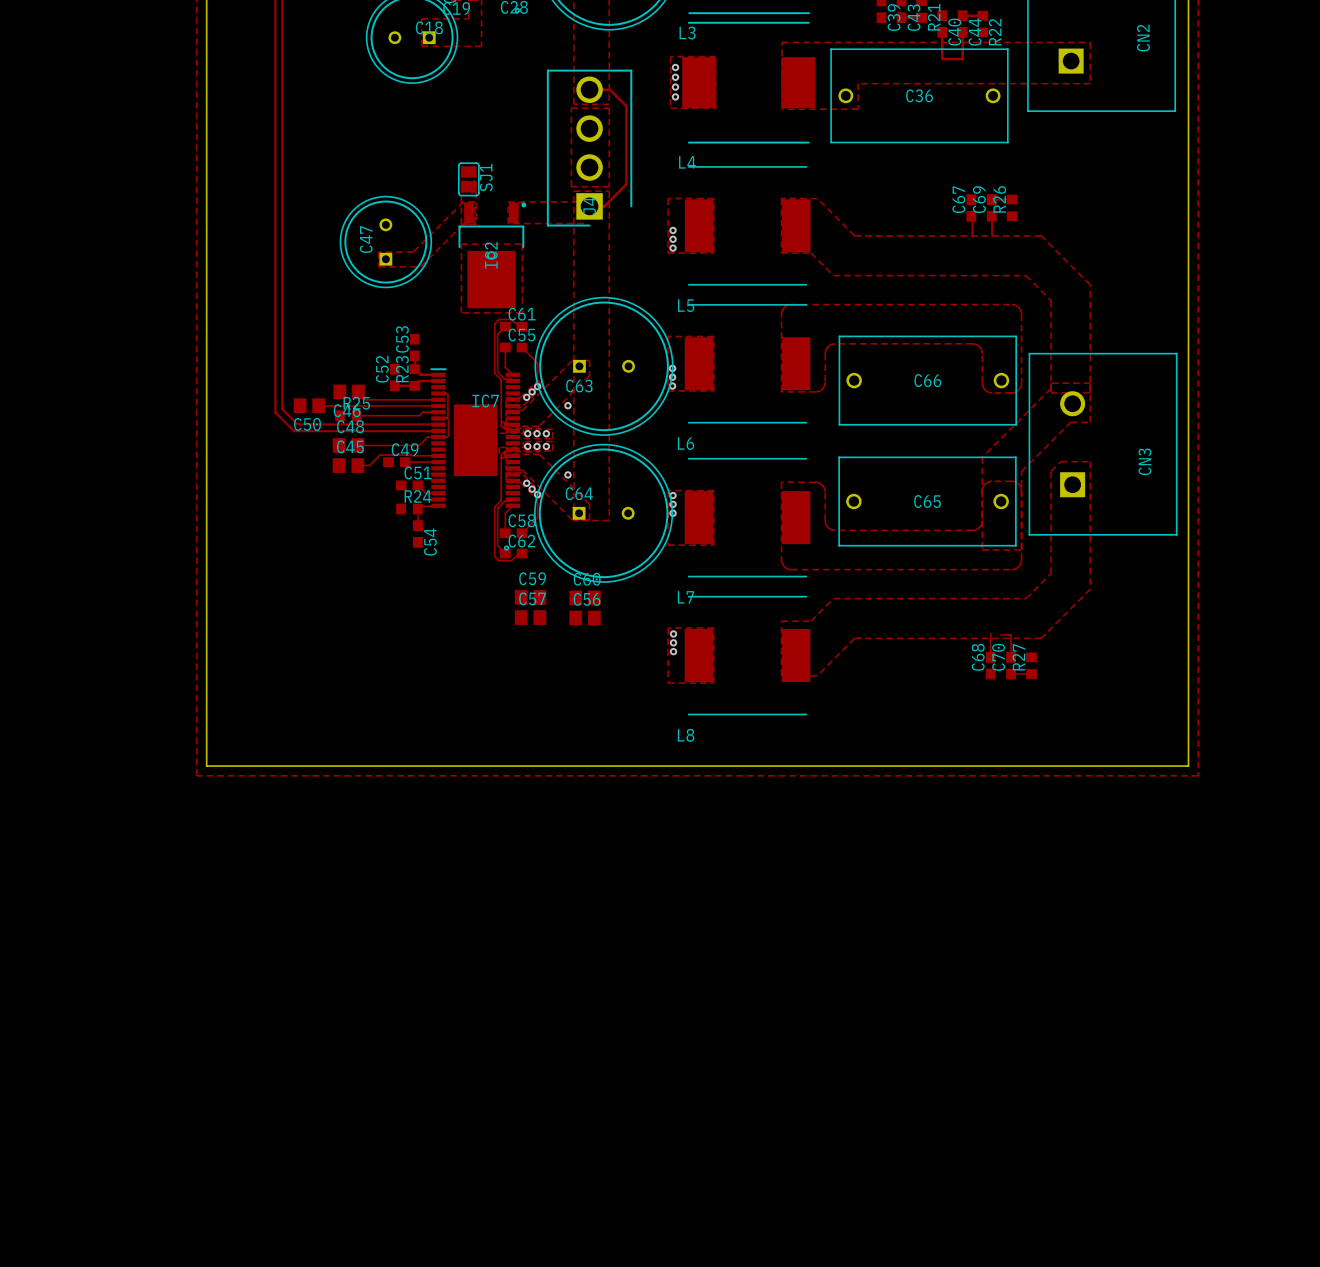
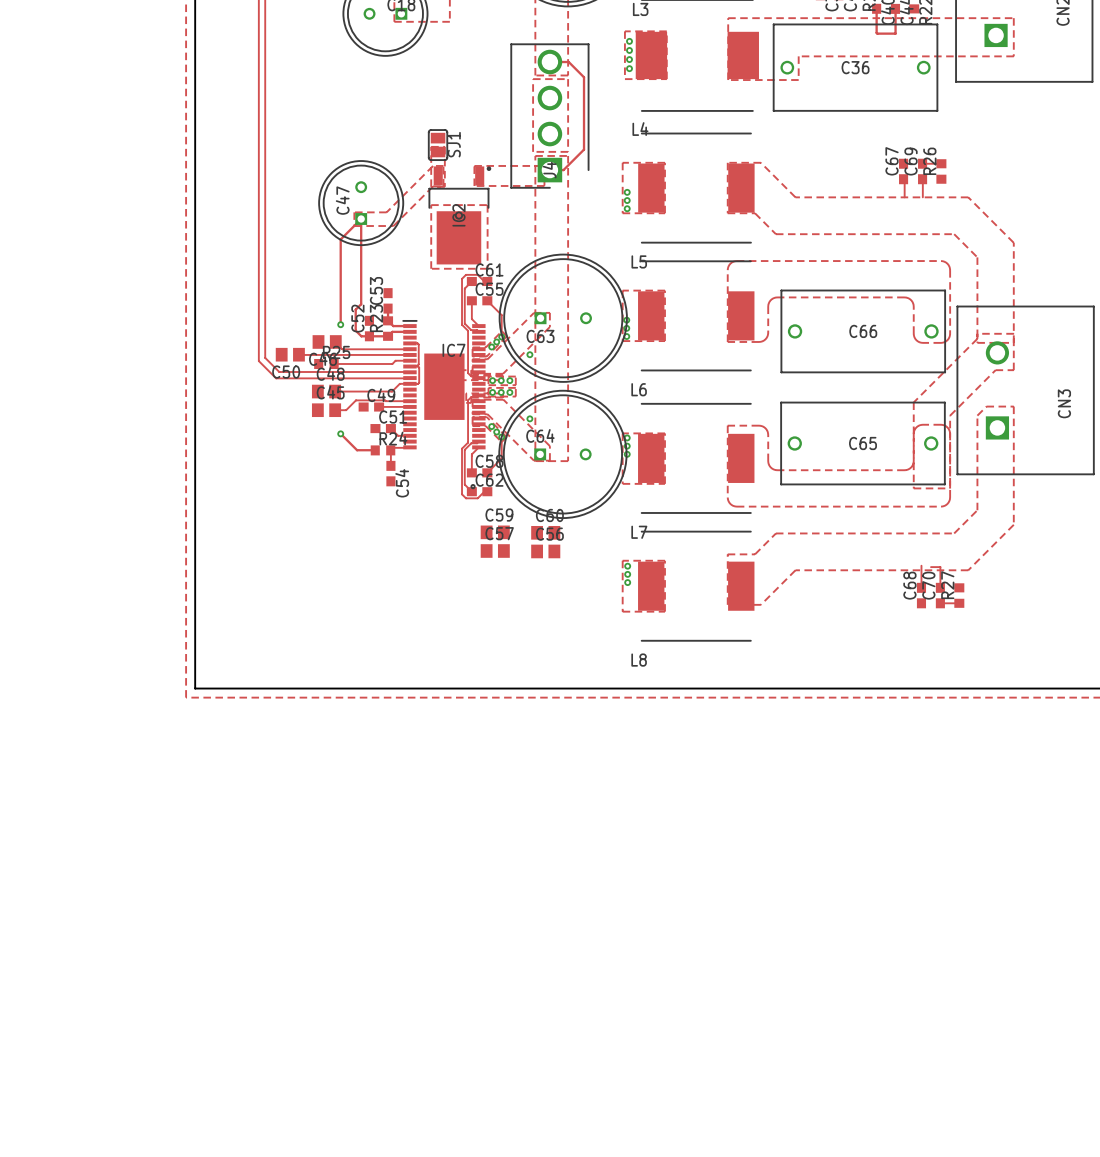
track: none -> (340, 324) (340, 239) (361, 219) (361, 304) (355, 309) (355, 330) (361, 336) (369, 336)
via: none -> (340, 324)
track: none -> (340, 433) (357, 450) (375, 450)
via: none -> (340, 433)

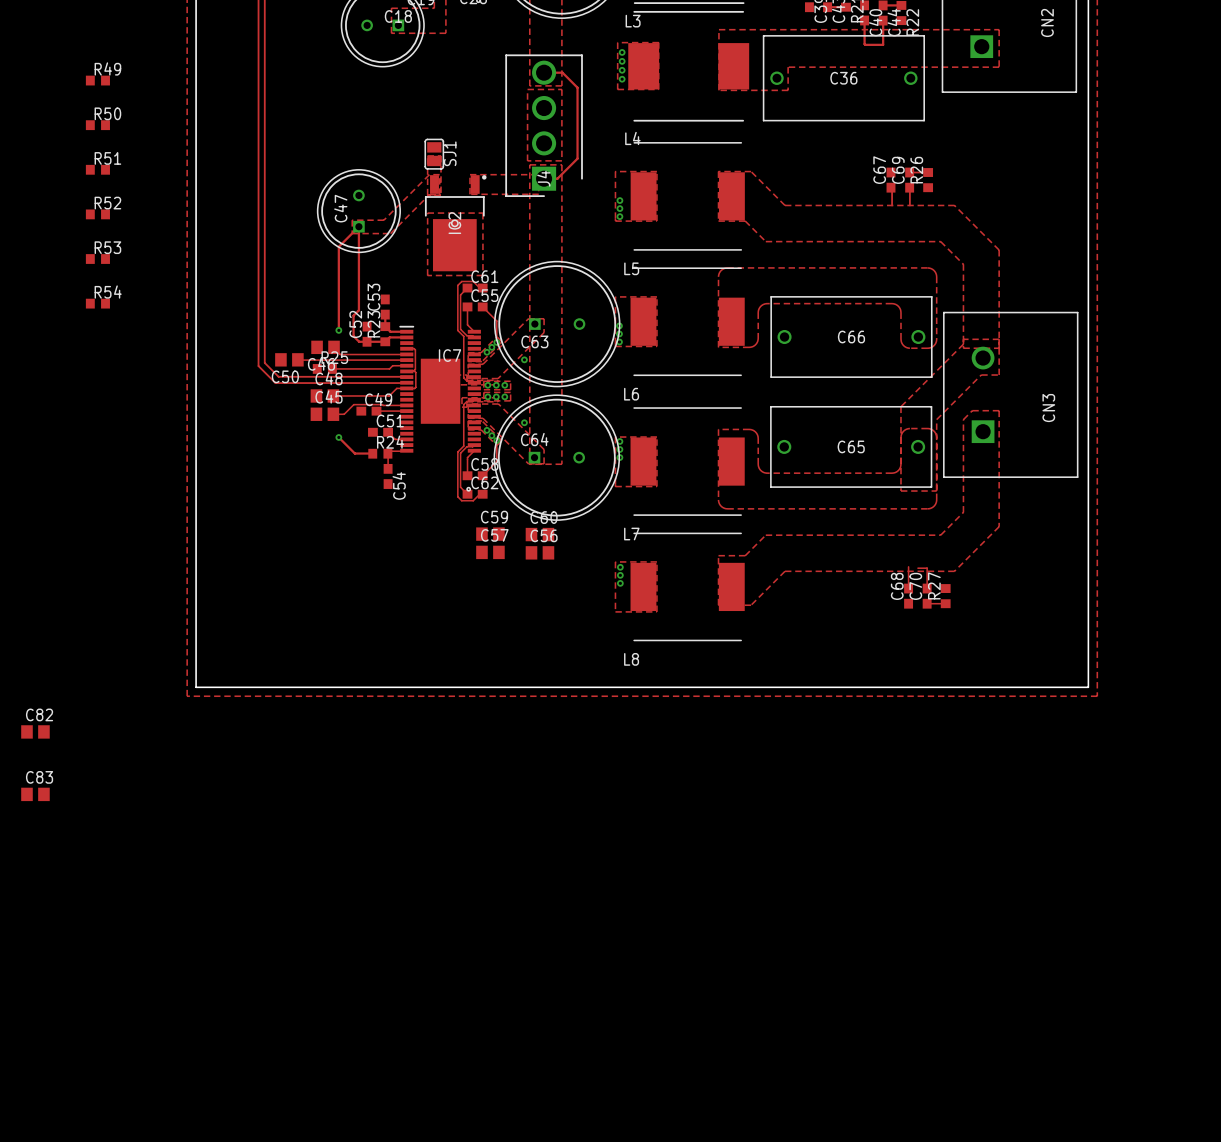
R49: none -> (97, 80)
R50: none -> (97, 125)
R51: none -> (97, 169)
R52: none -> (97, 214)
R53: none -> (97, 259)
R54: none -> (97, 303)
C82: none -> (35, 731)
C83: none -> (35, 794)

